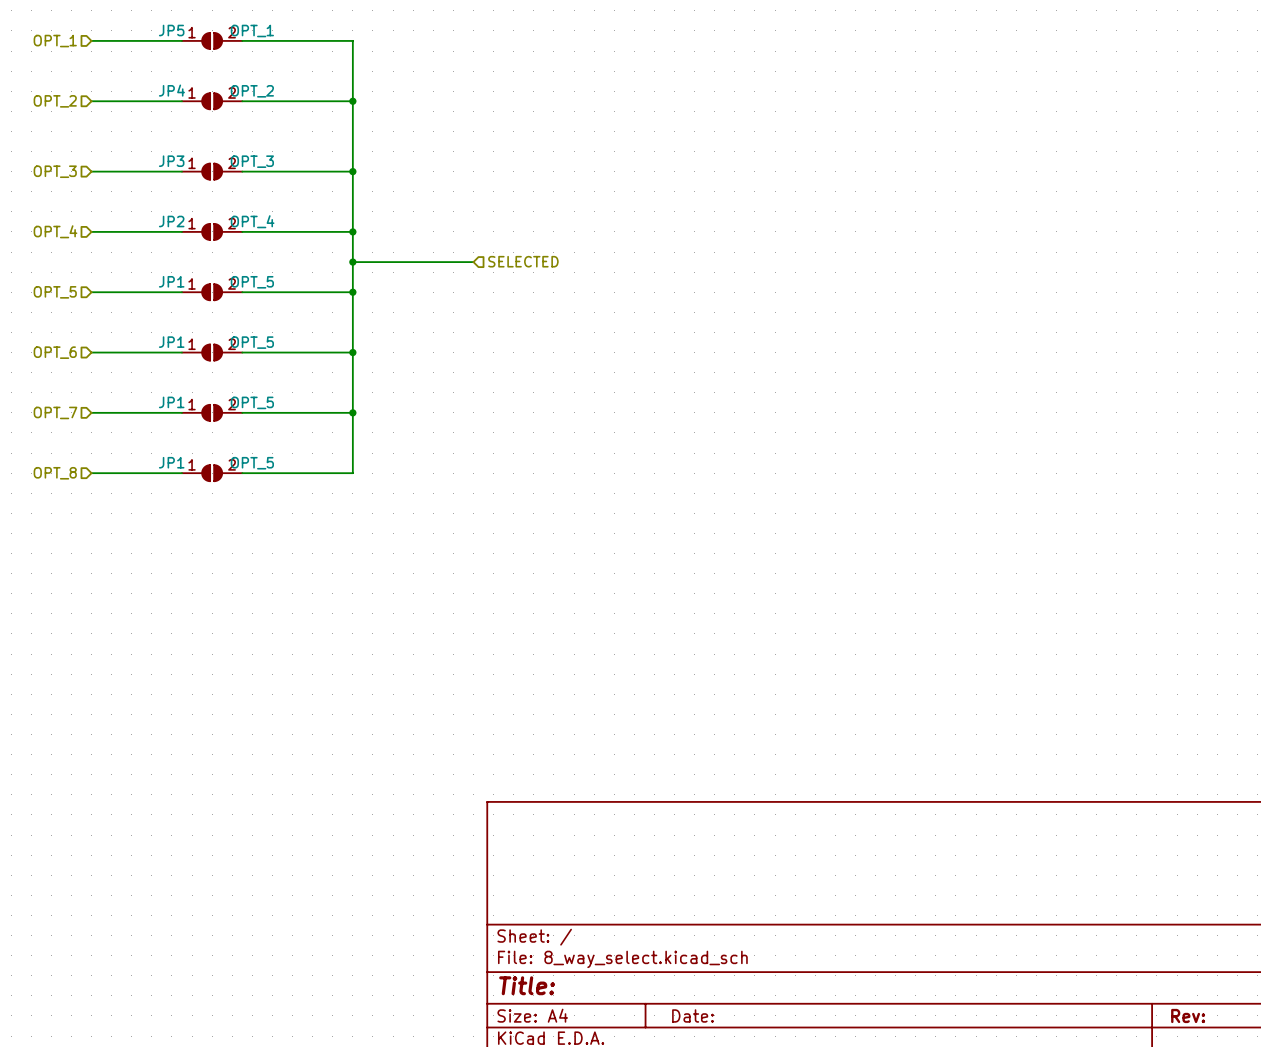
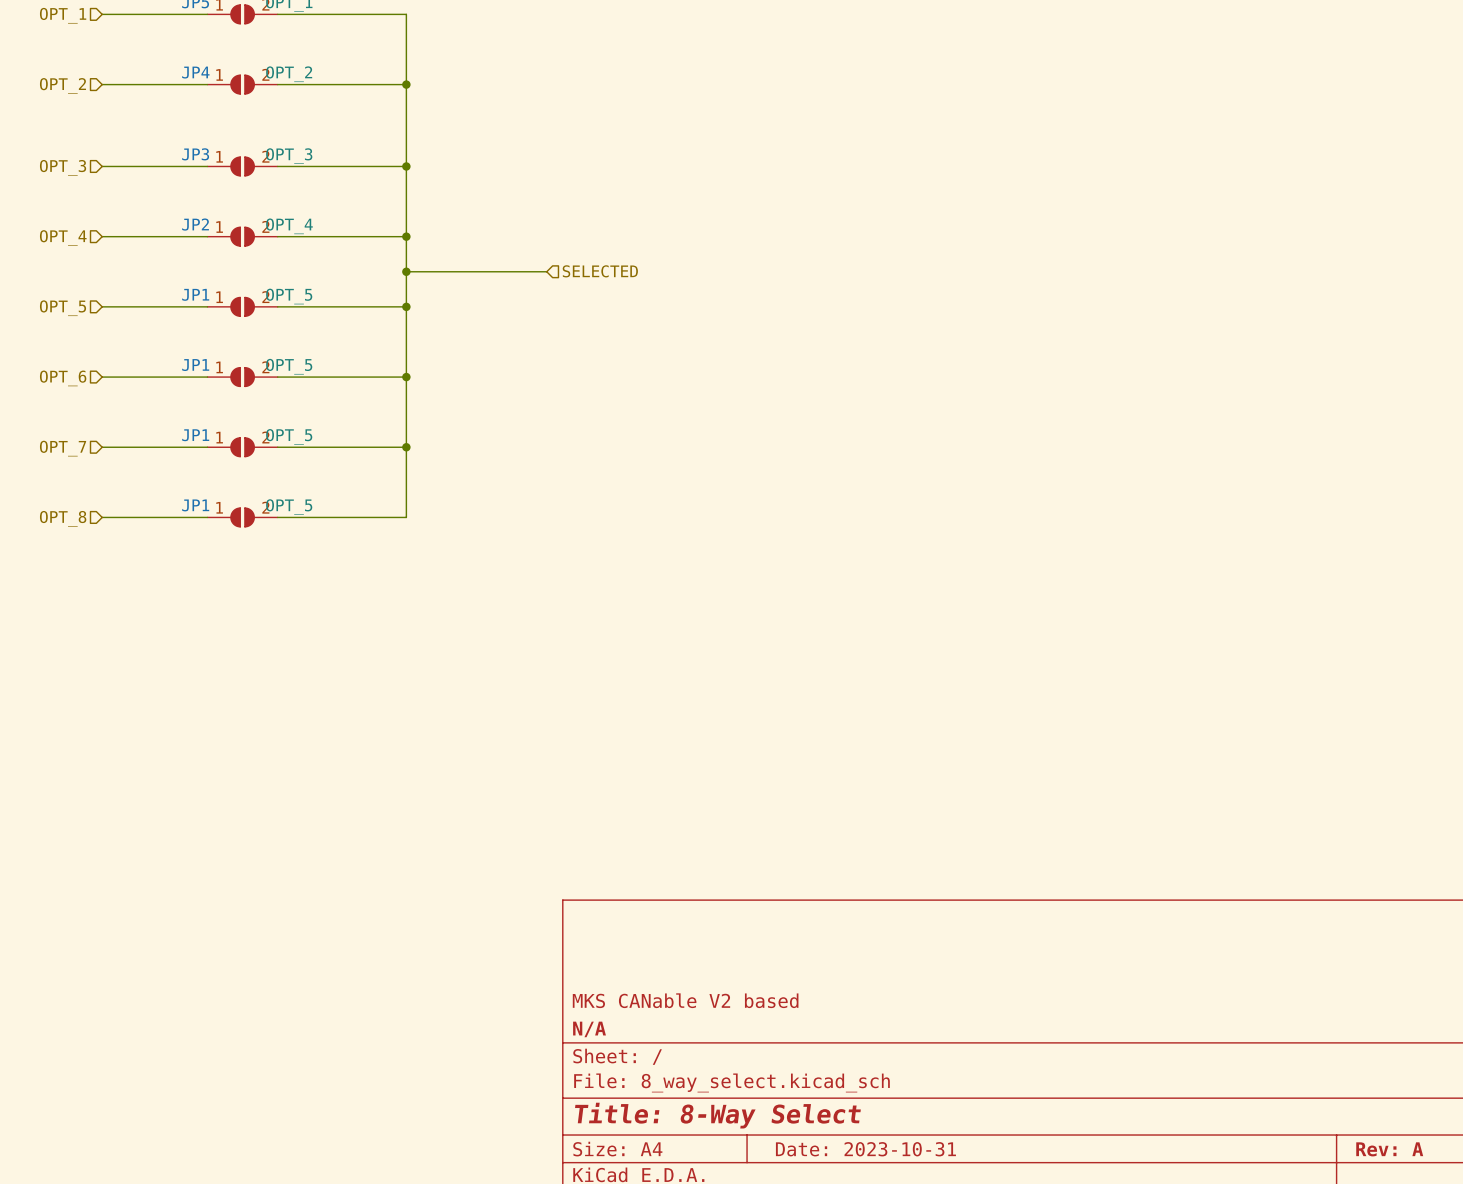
title block: none -> MKS CANable V2 based (685, 1000)
title block: none -> N/A (589, 1029)
title block: Title: (527, 985) -> Title: 8-Way Select (717, 1115)
title block: Date: (692, 1015) -> Date: 2023-10-31 (865, 1149)
title block: Rev: (1188, 1015) -> Rev: A (1389, 1149)

